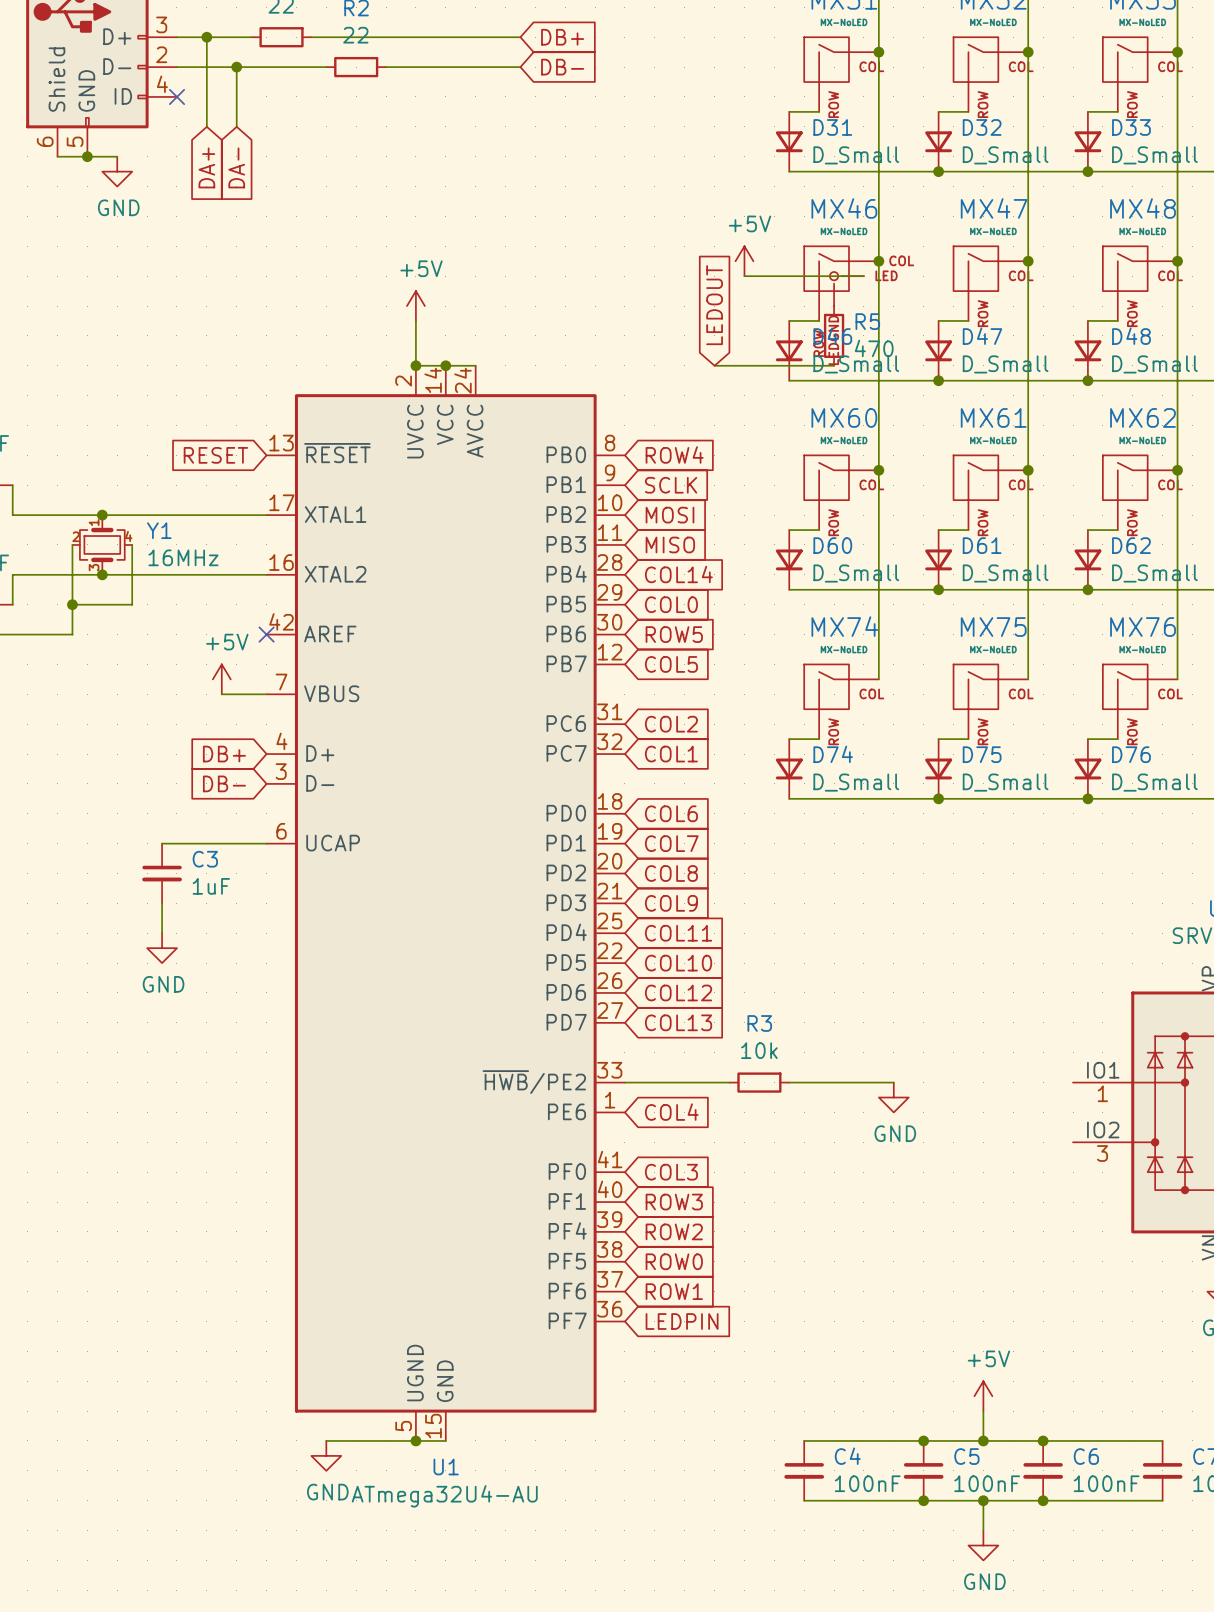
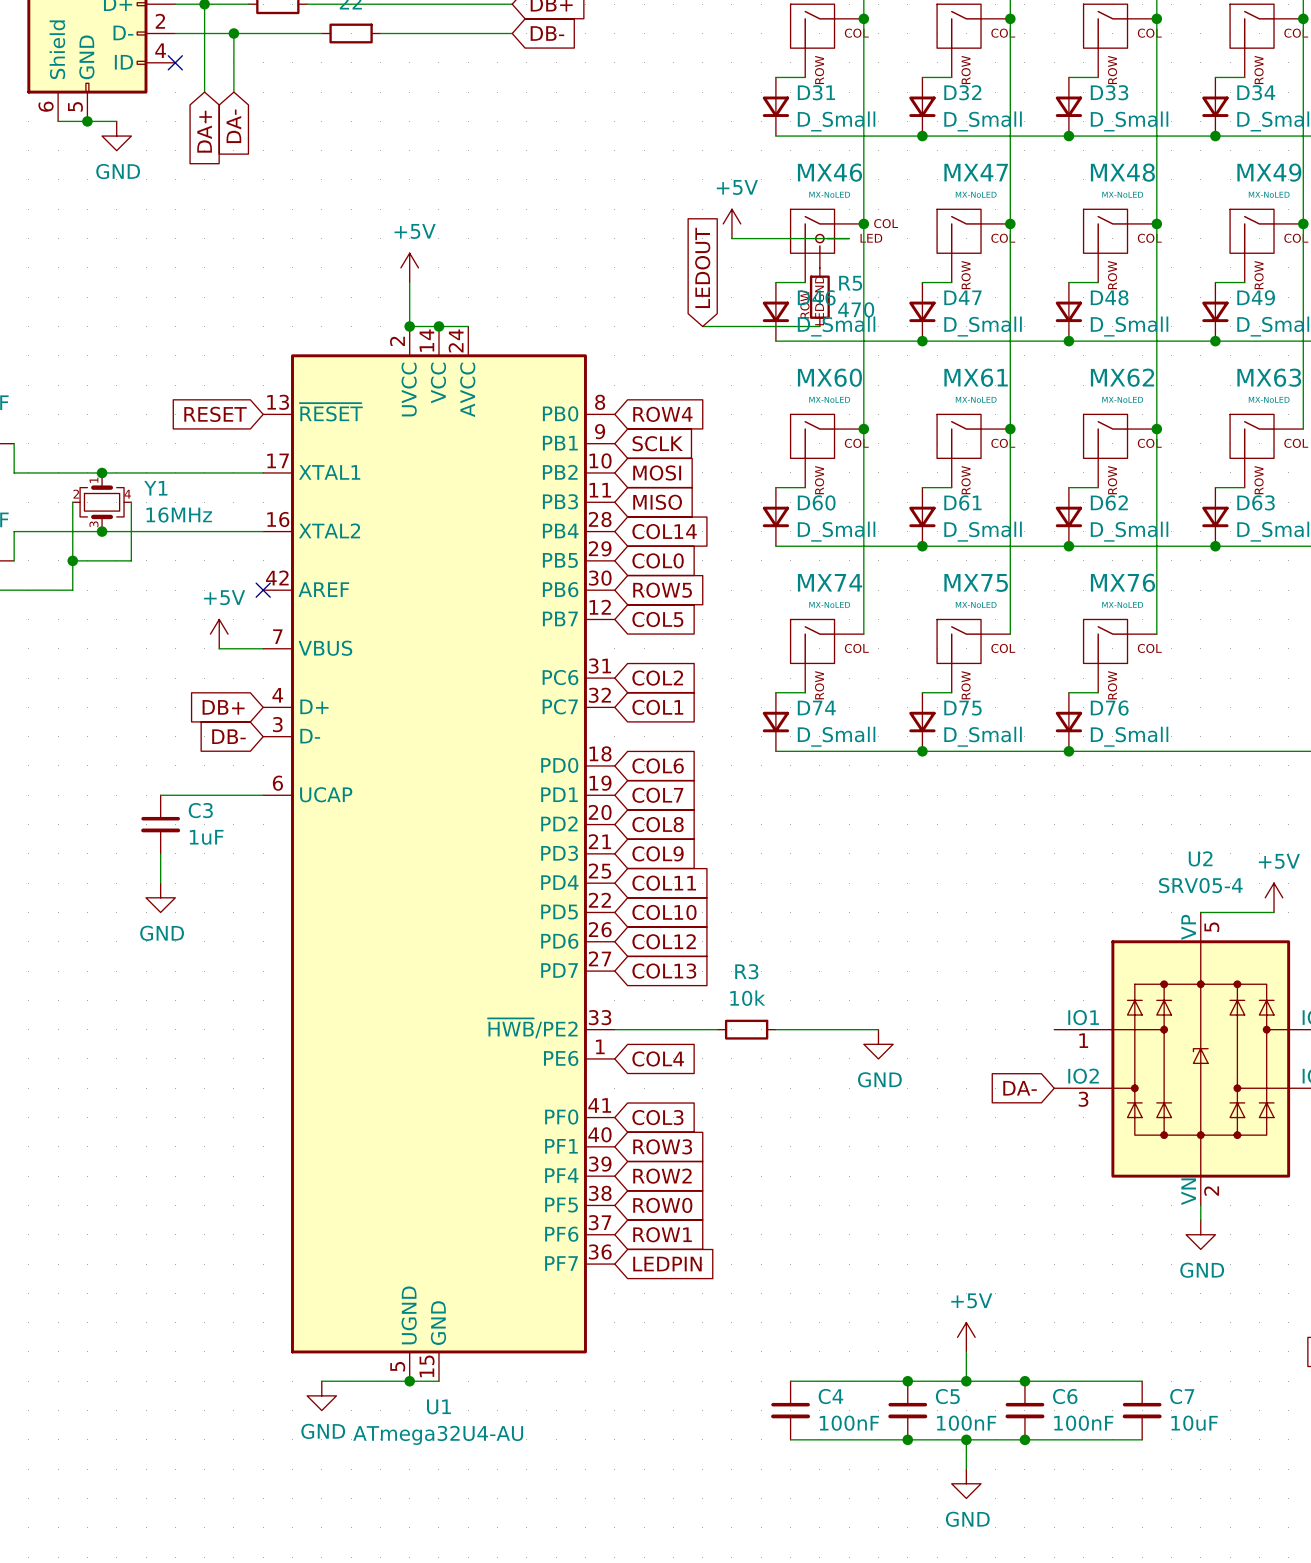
global label: none -> DA- (1020, 1088)

